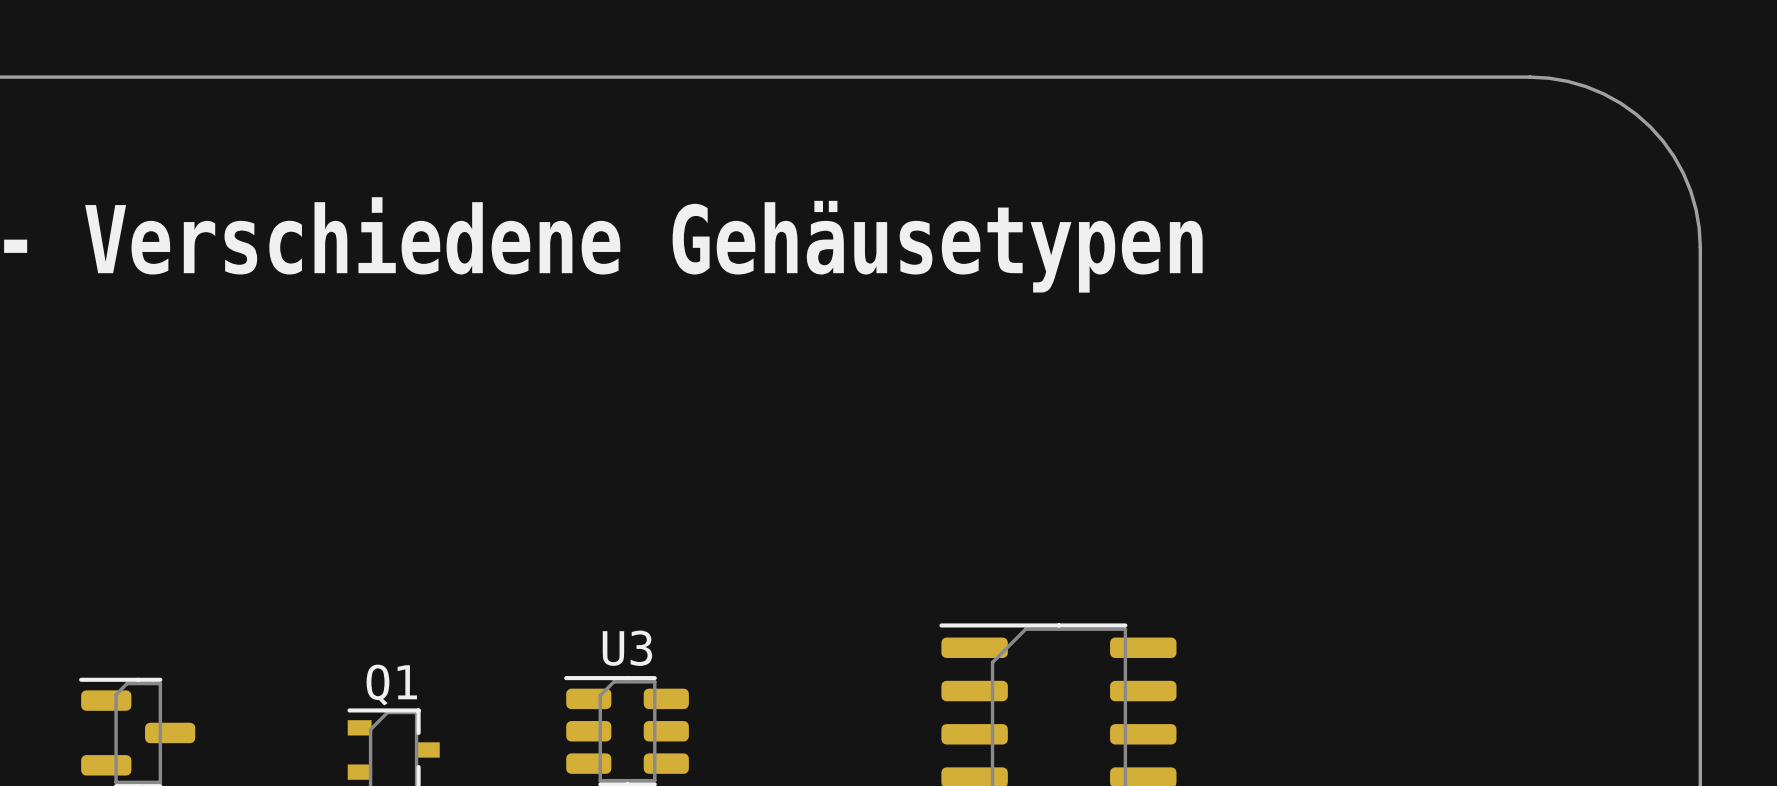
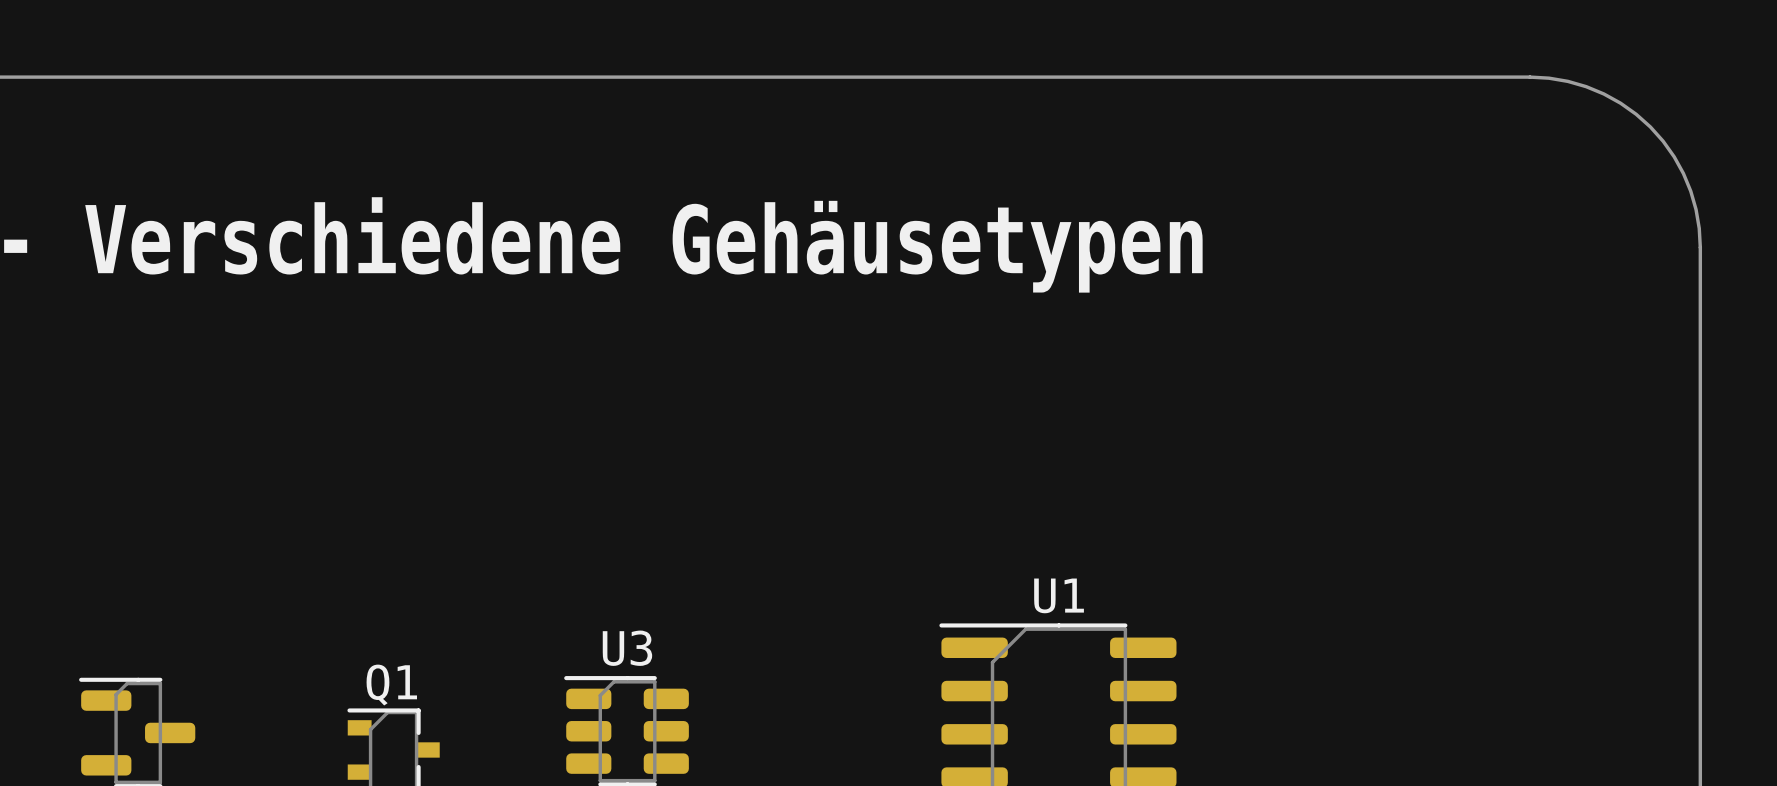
U1 name: none -> U1 (1059, 595)

